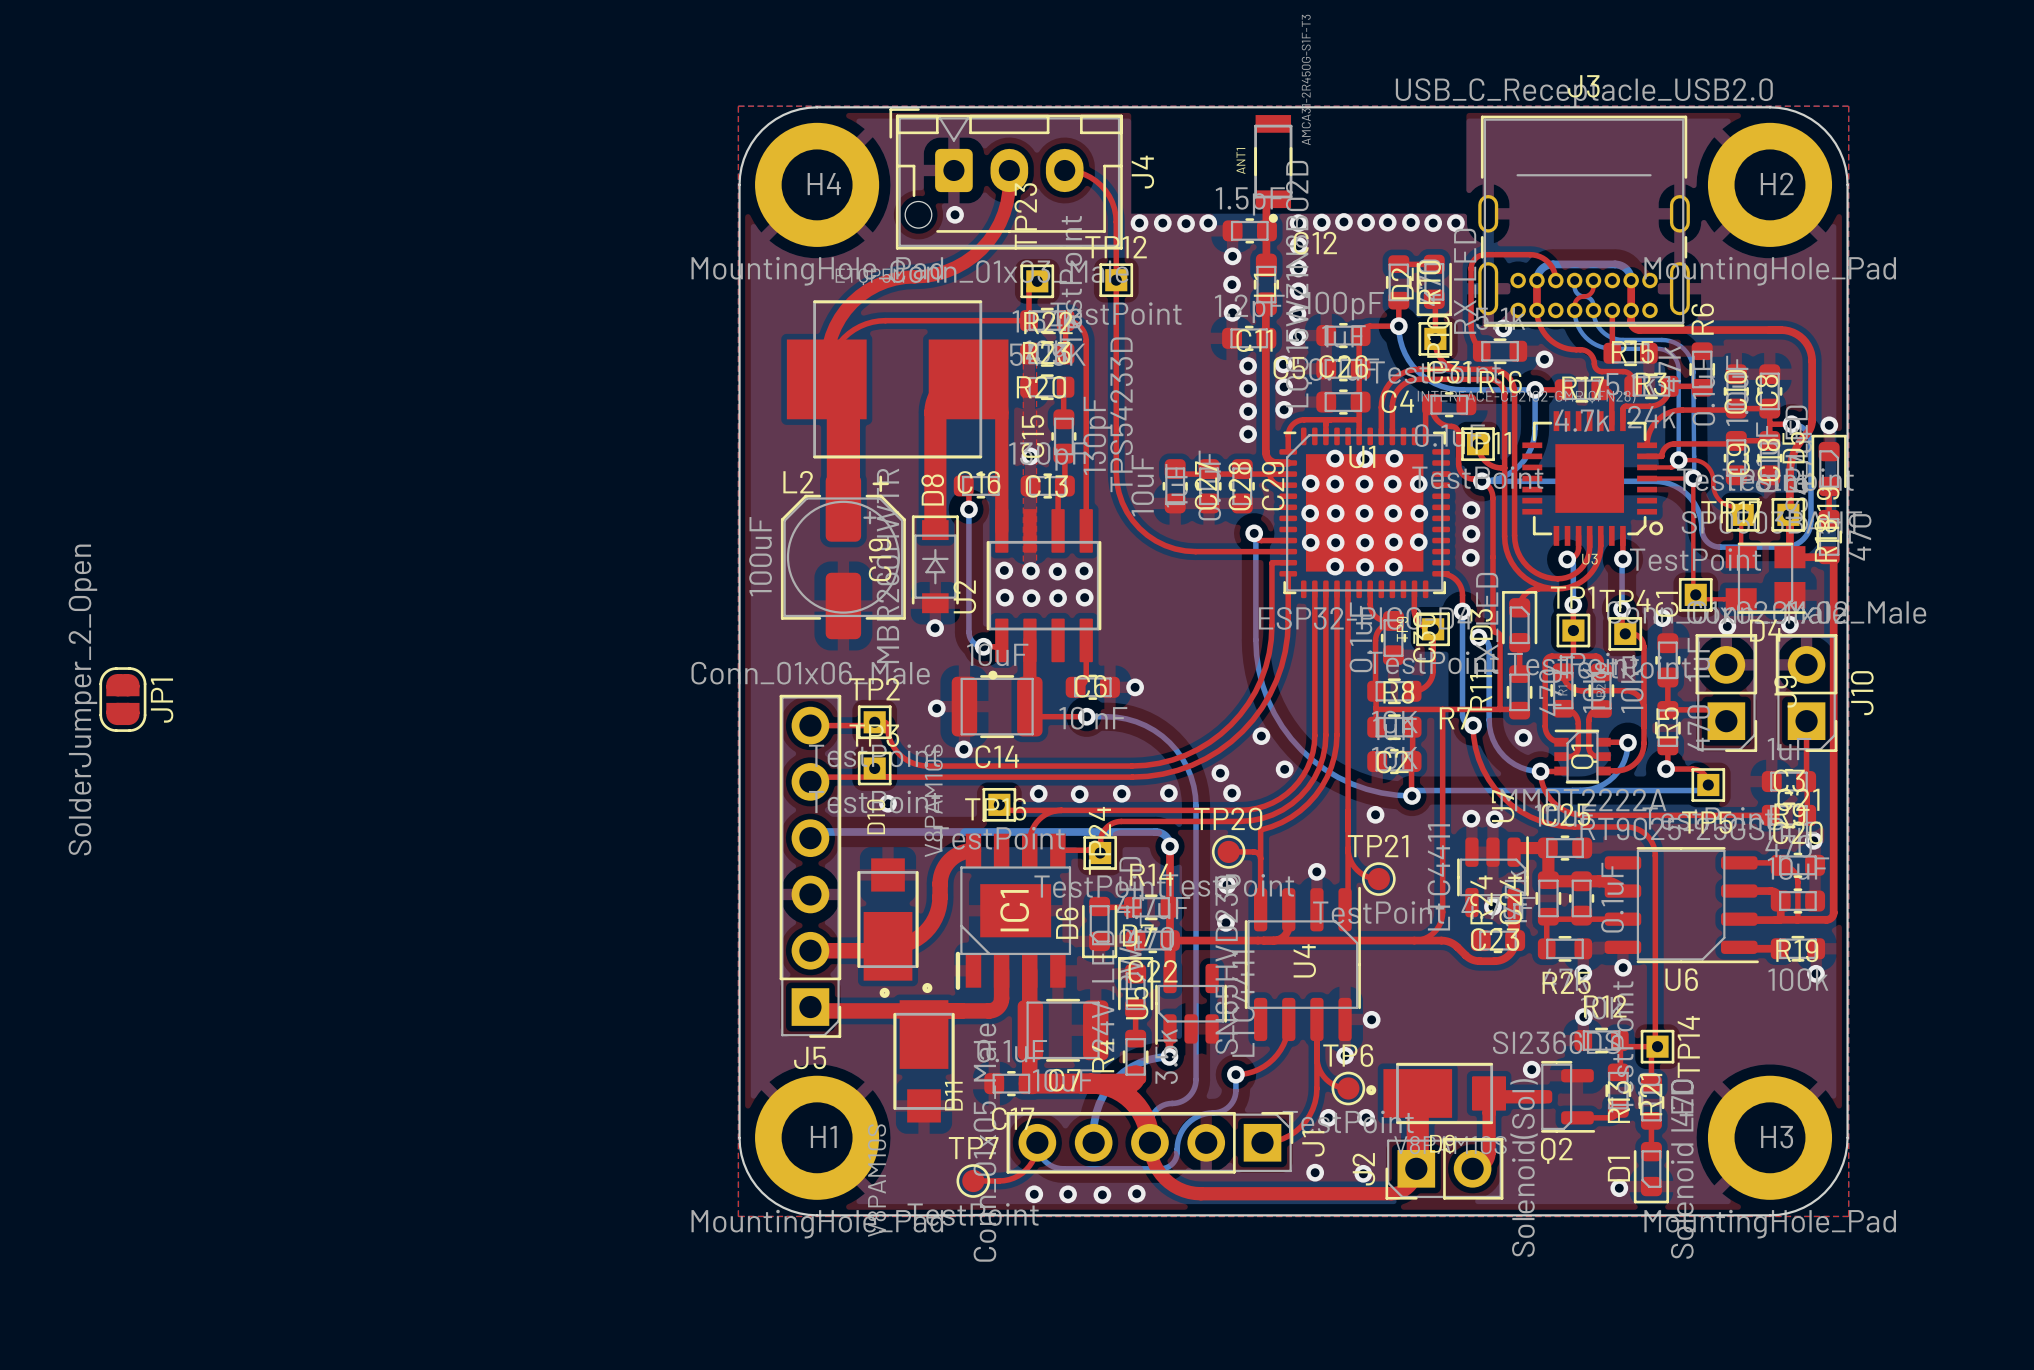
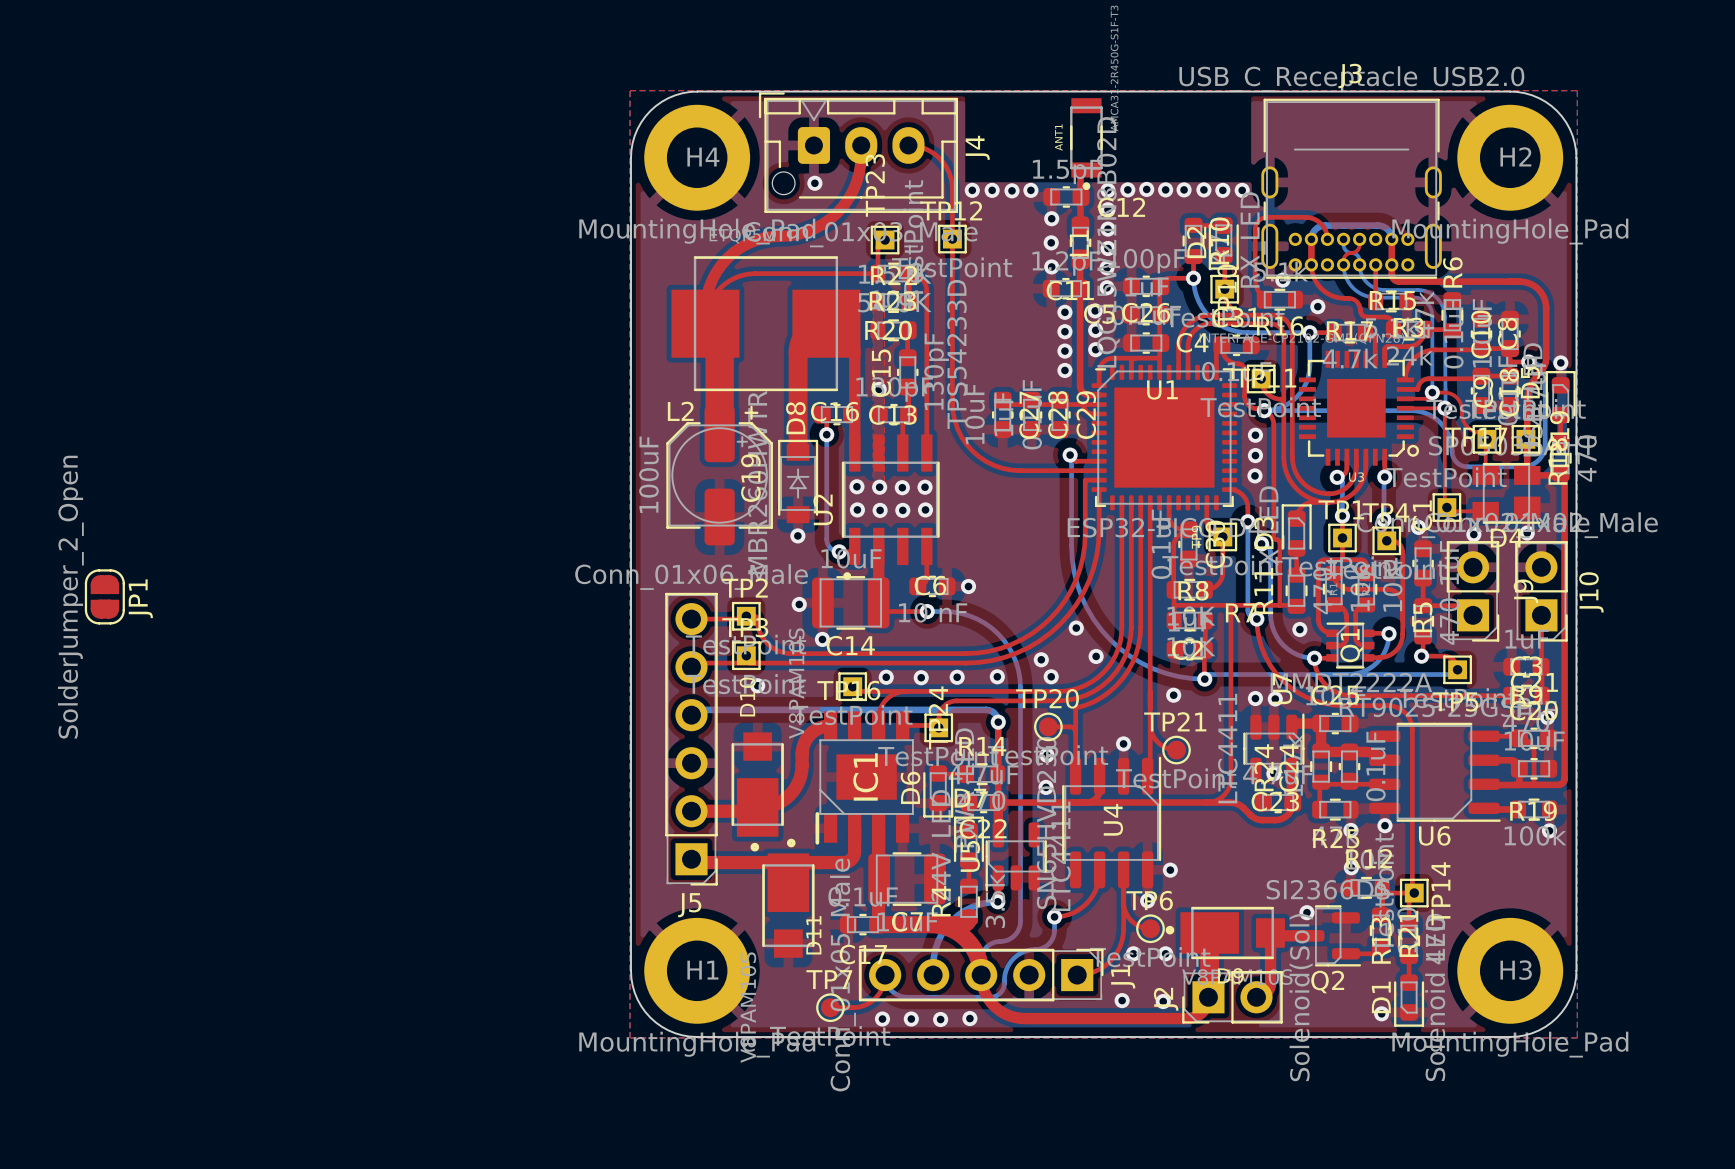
via: (1335, 458) -> none
via: (1394, 458) -> none
via: (1365, 459) -> none
via: (1310, 483) -> none
via: (1335, 484) -> none
via: (1364, 484) -> none
via: (1392, 484) -> none
via: (1418, 484) -> none
via: (1310, 513) -> none
via: (1335, 513) -> none
via: (1364, 513) -> none
via: (1393, 513) -> none
via: (1419, 513) -> none
via: (1310, 542) -> none
via: (1335, 542) -> none
via: (1365, 542) -> none
via: (1393, 542) -> none
via: (1418, 542) -> none
via: (1335, 566) -> none
via: (1365, 567) -> none
via: (1393, 567) -> none

